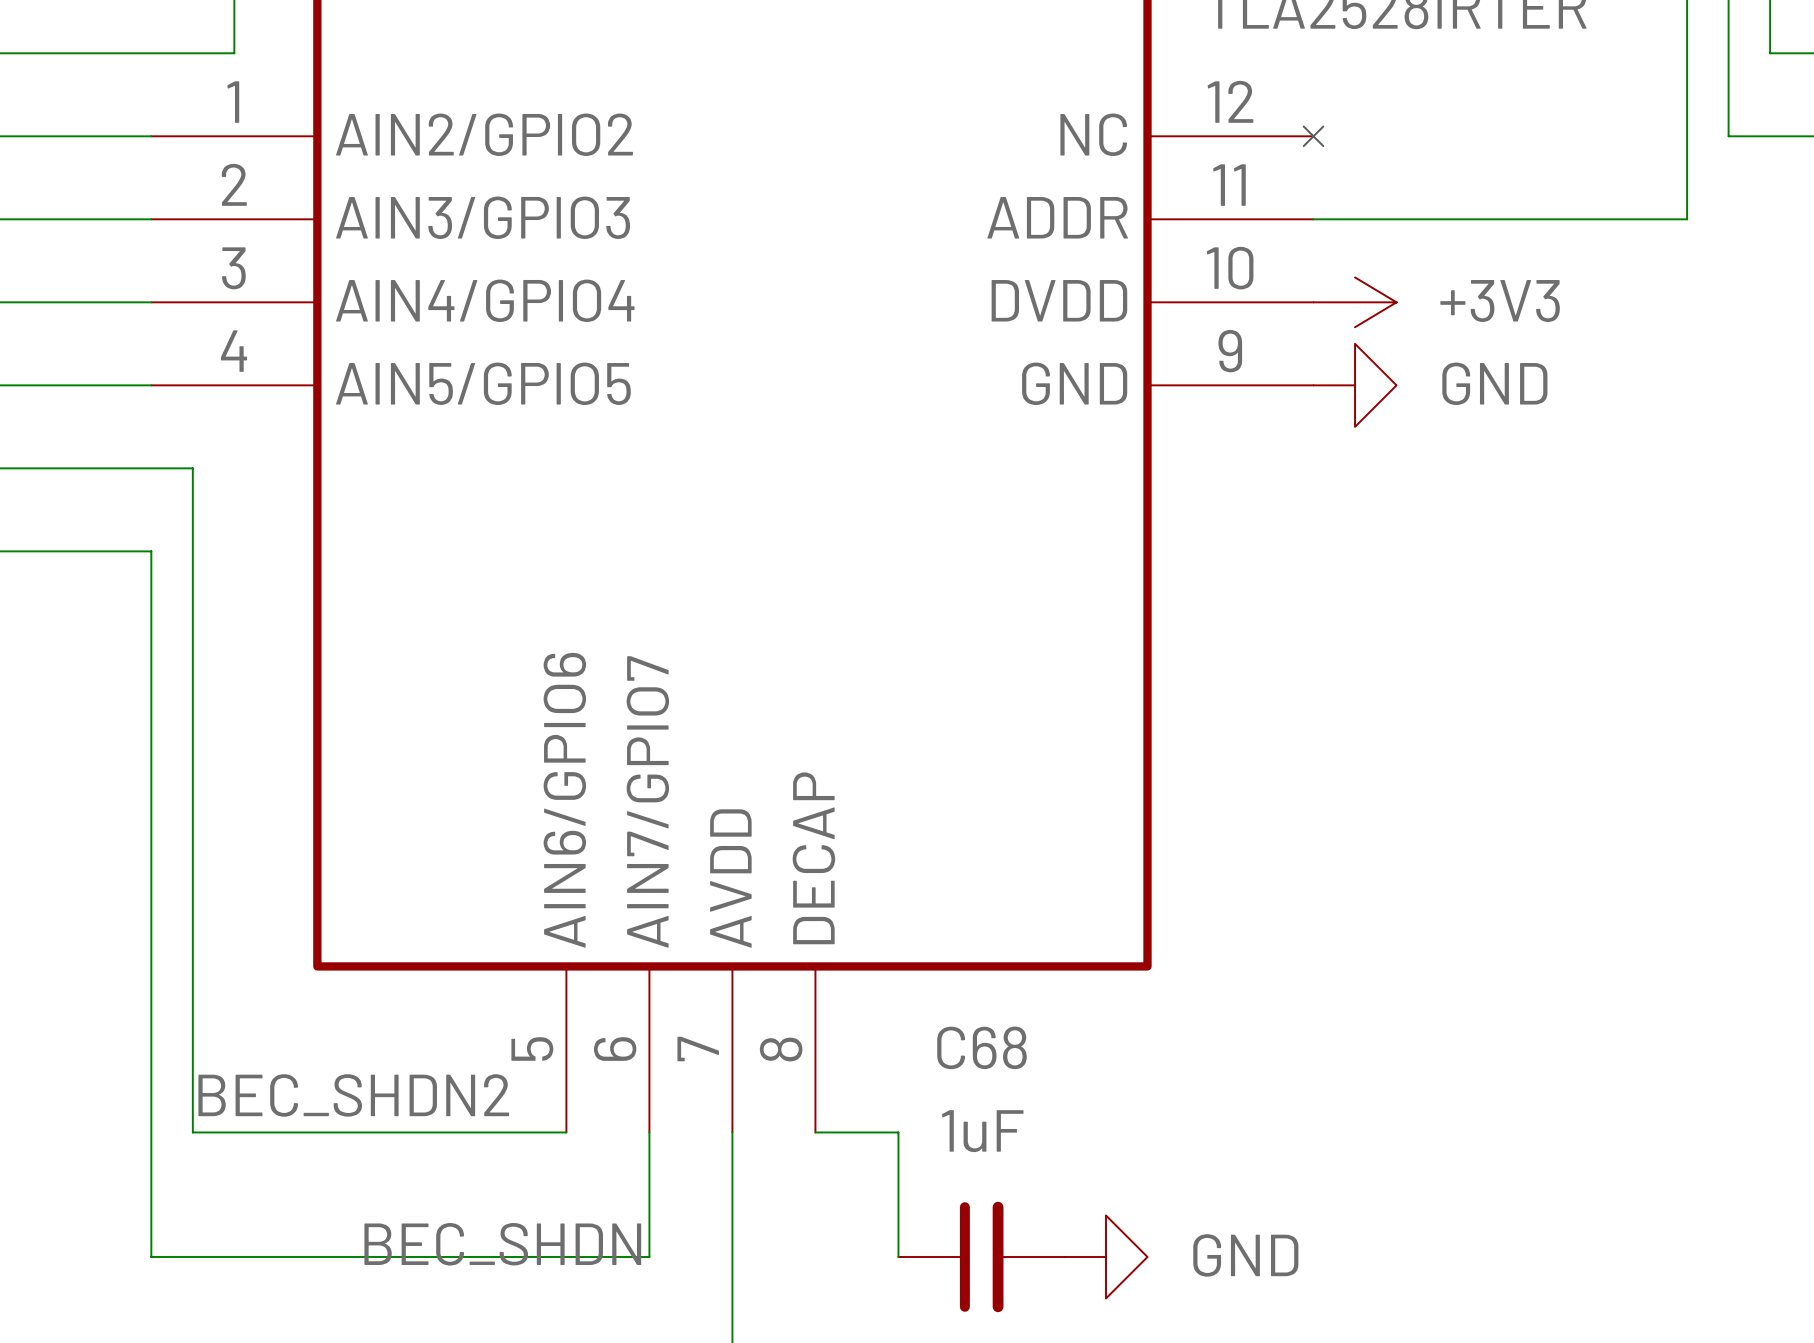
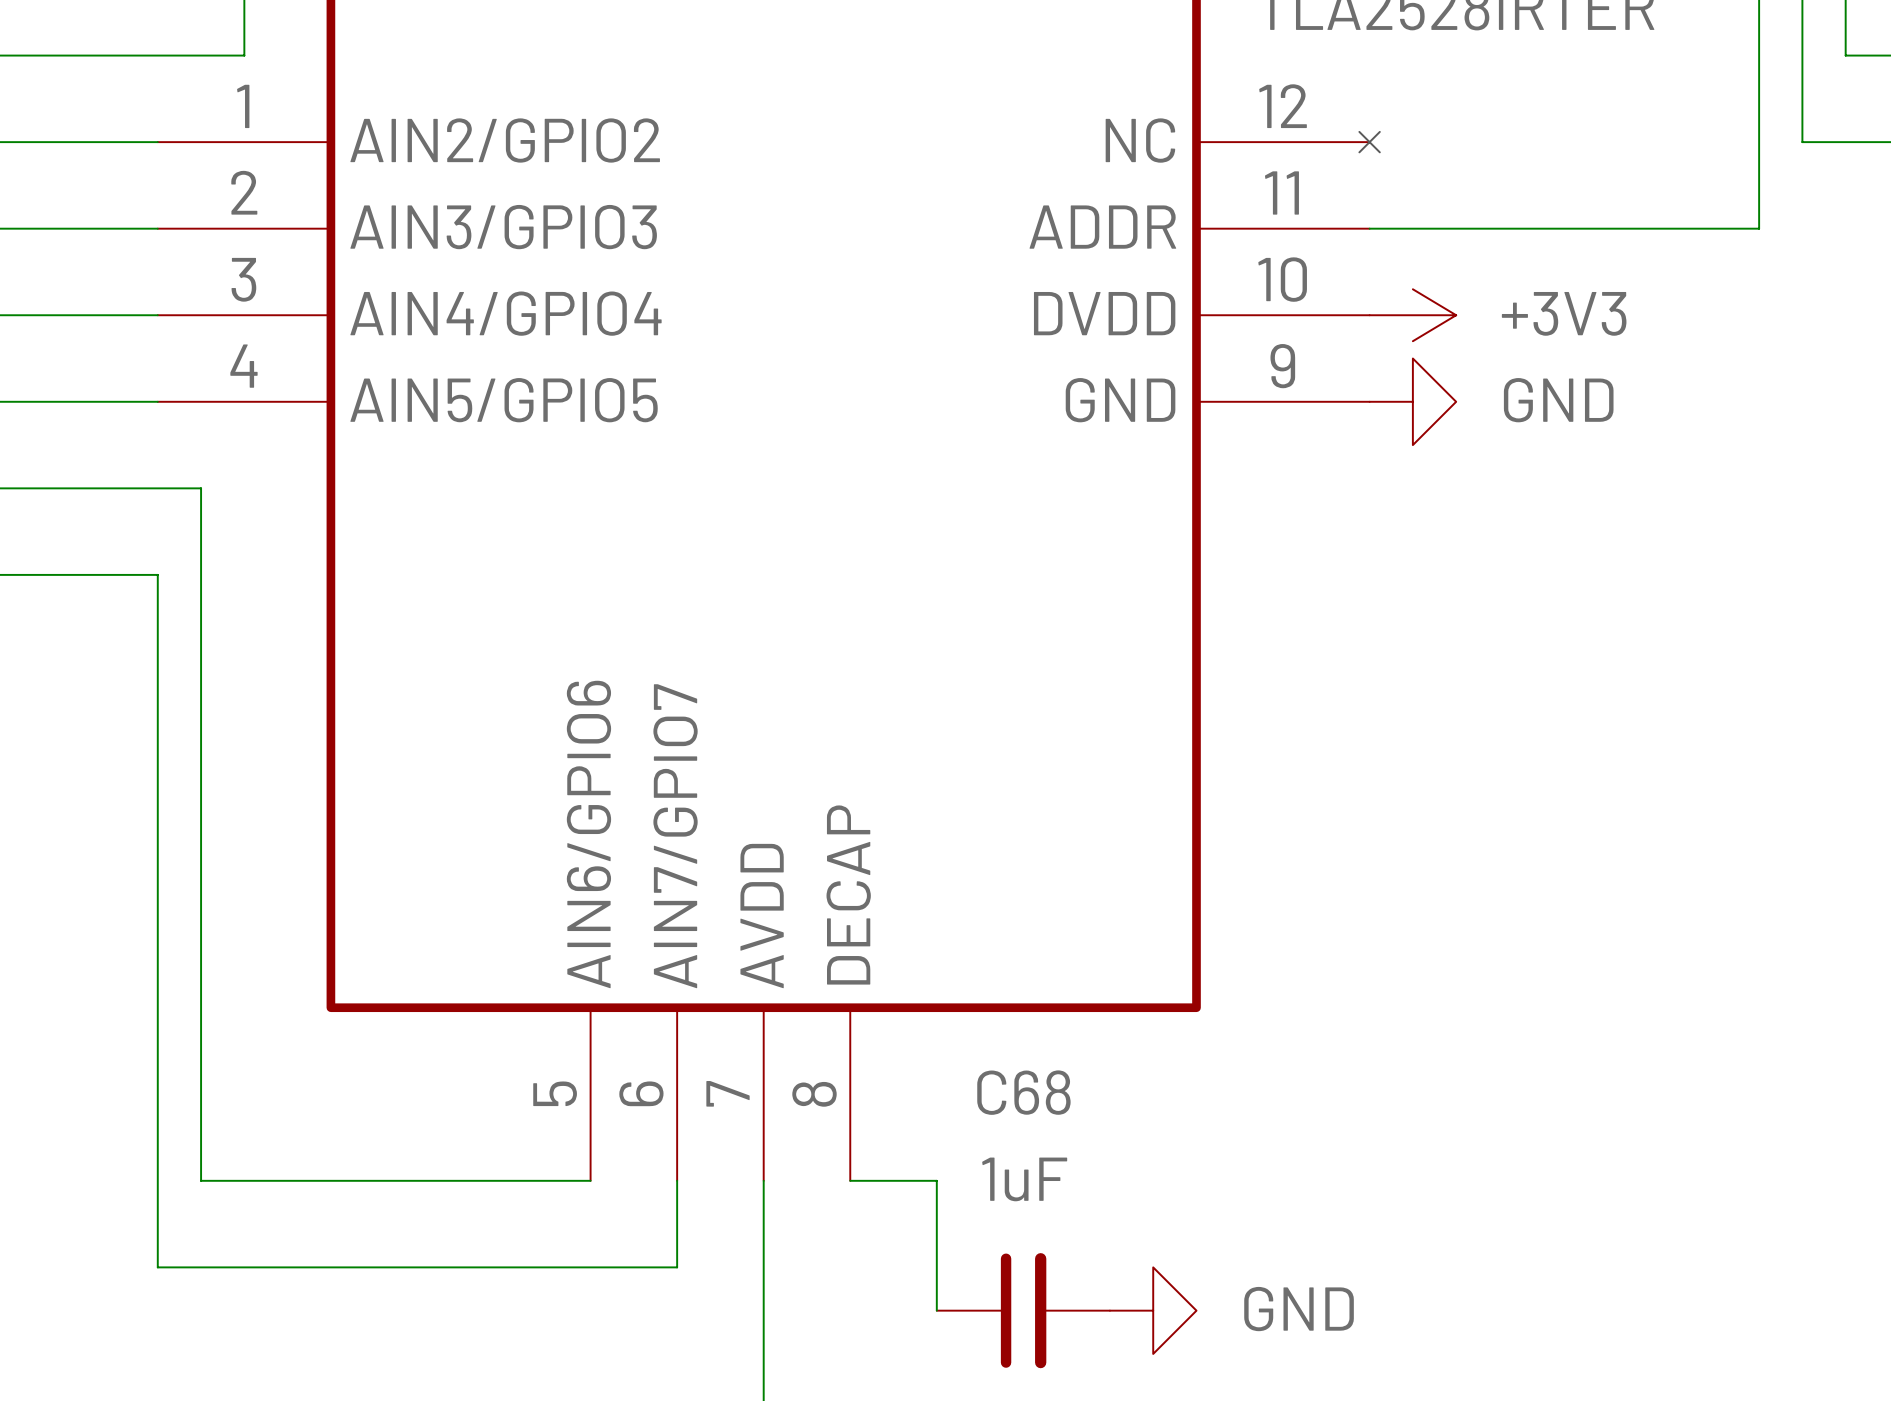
label: BEC_SHDN2 (353, 1095) -> none
wire: (151, 1215) (151, 1256) (649, 1256) (649, 1215) -> (157, 1267) (677, 1267)
label: BEC_SHDN (502, 1244) -> none

